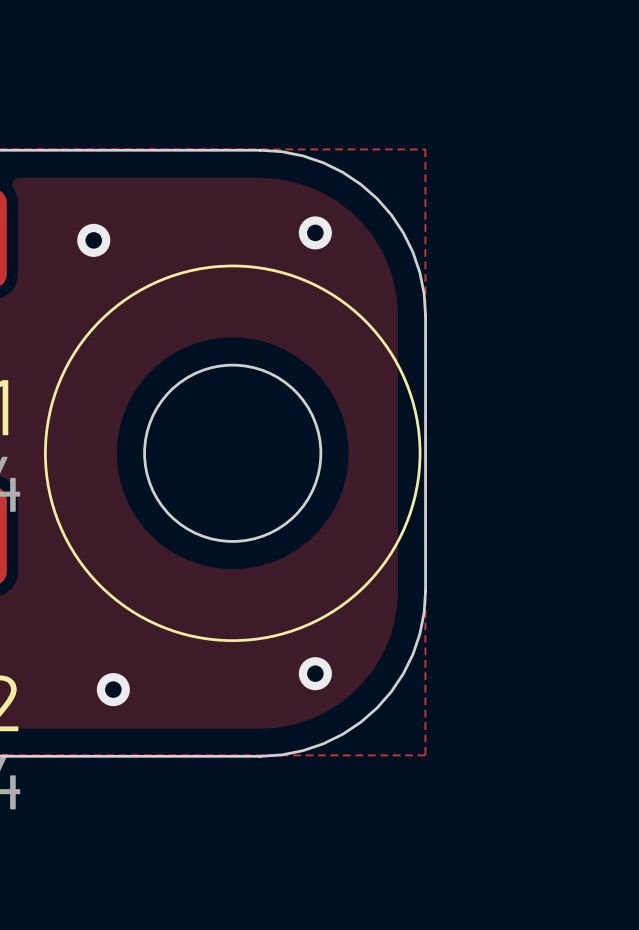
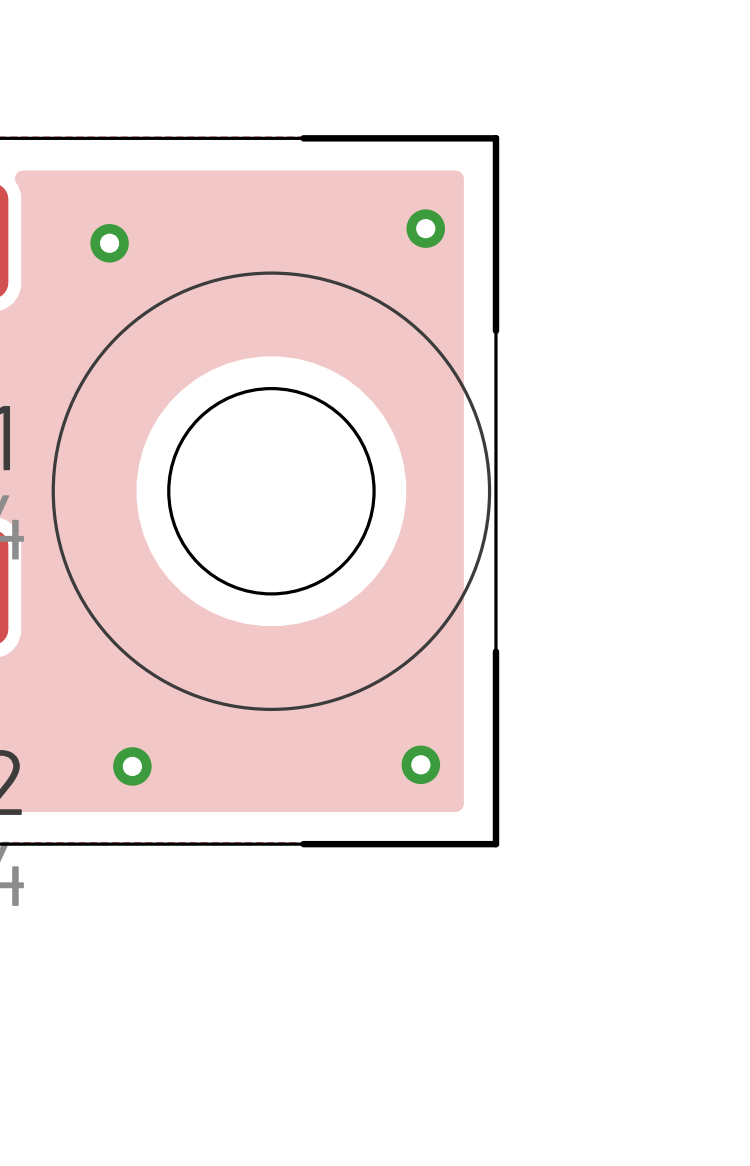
board edge: (260, 150) (281, 151) (323, 162) (360, 184) (377, 198) (403, 232) (412, 252) (424, 293) (425, 315) -> (303, 138) (495, 138) (495, 330)
via position: (315, 232) -> (425, 228)
board edge: (425, 591) (419, 633) (412, 654) (403, 673) (377, 707) (342, 734) (323, 743) (303, 750) (260, 756) -> (495, 651) (495, 844) (303, 844)
via position: (315, 673) -> (420, 764)

